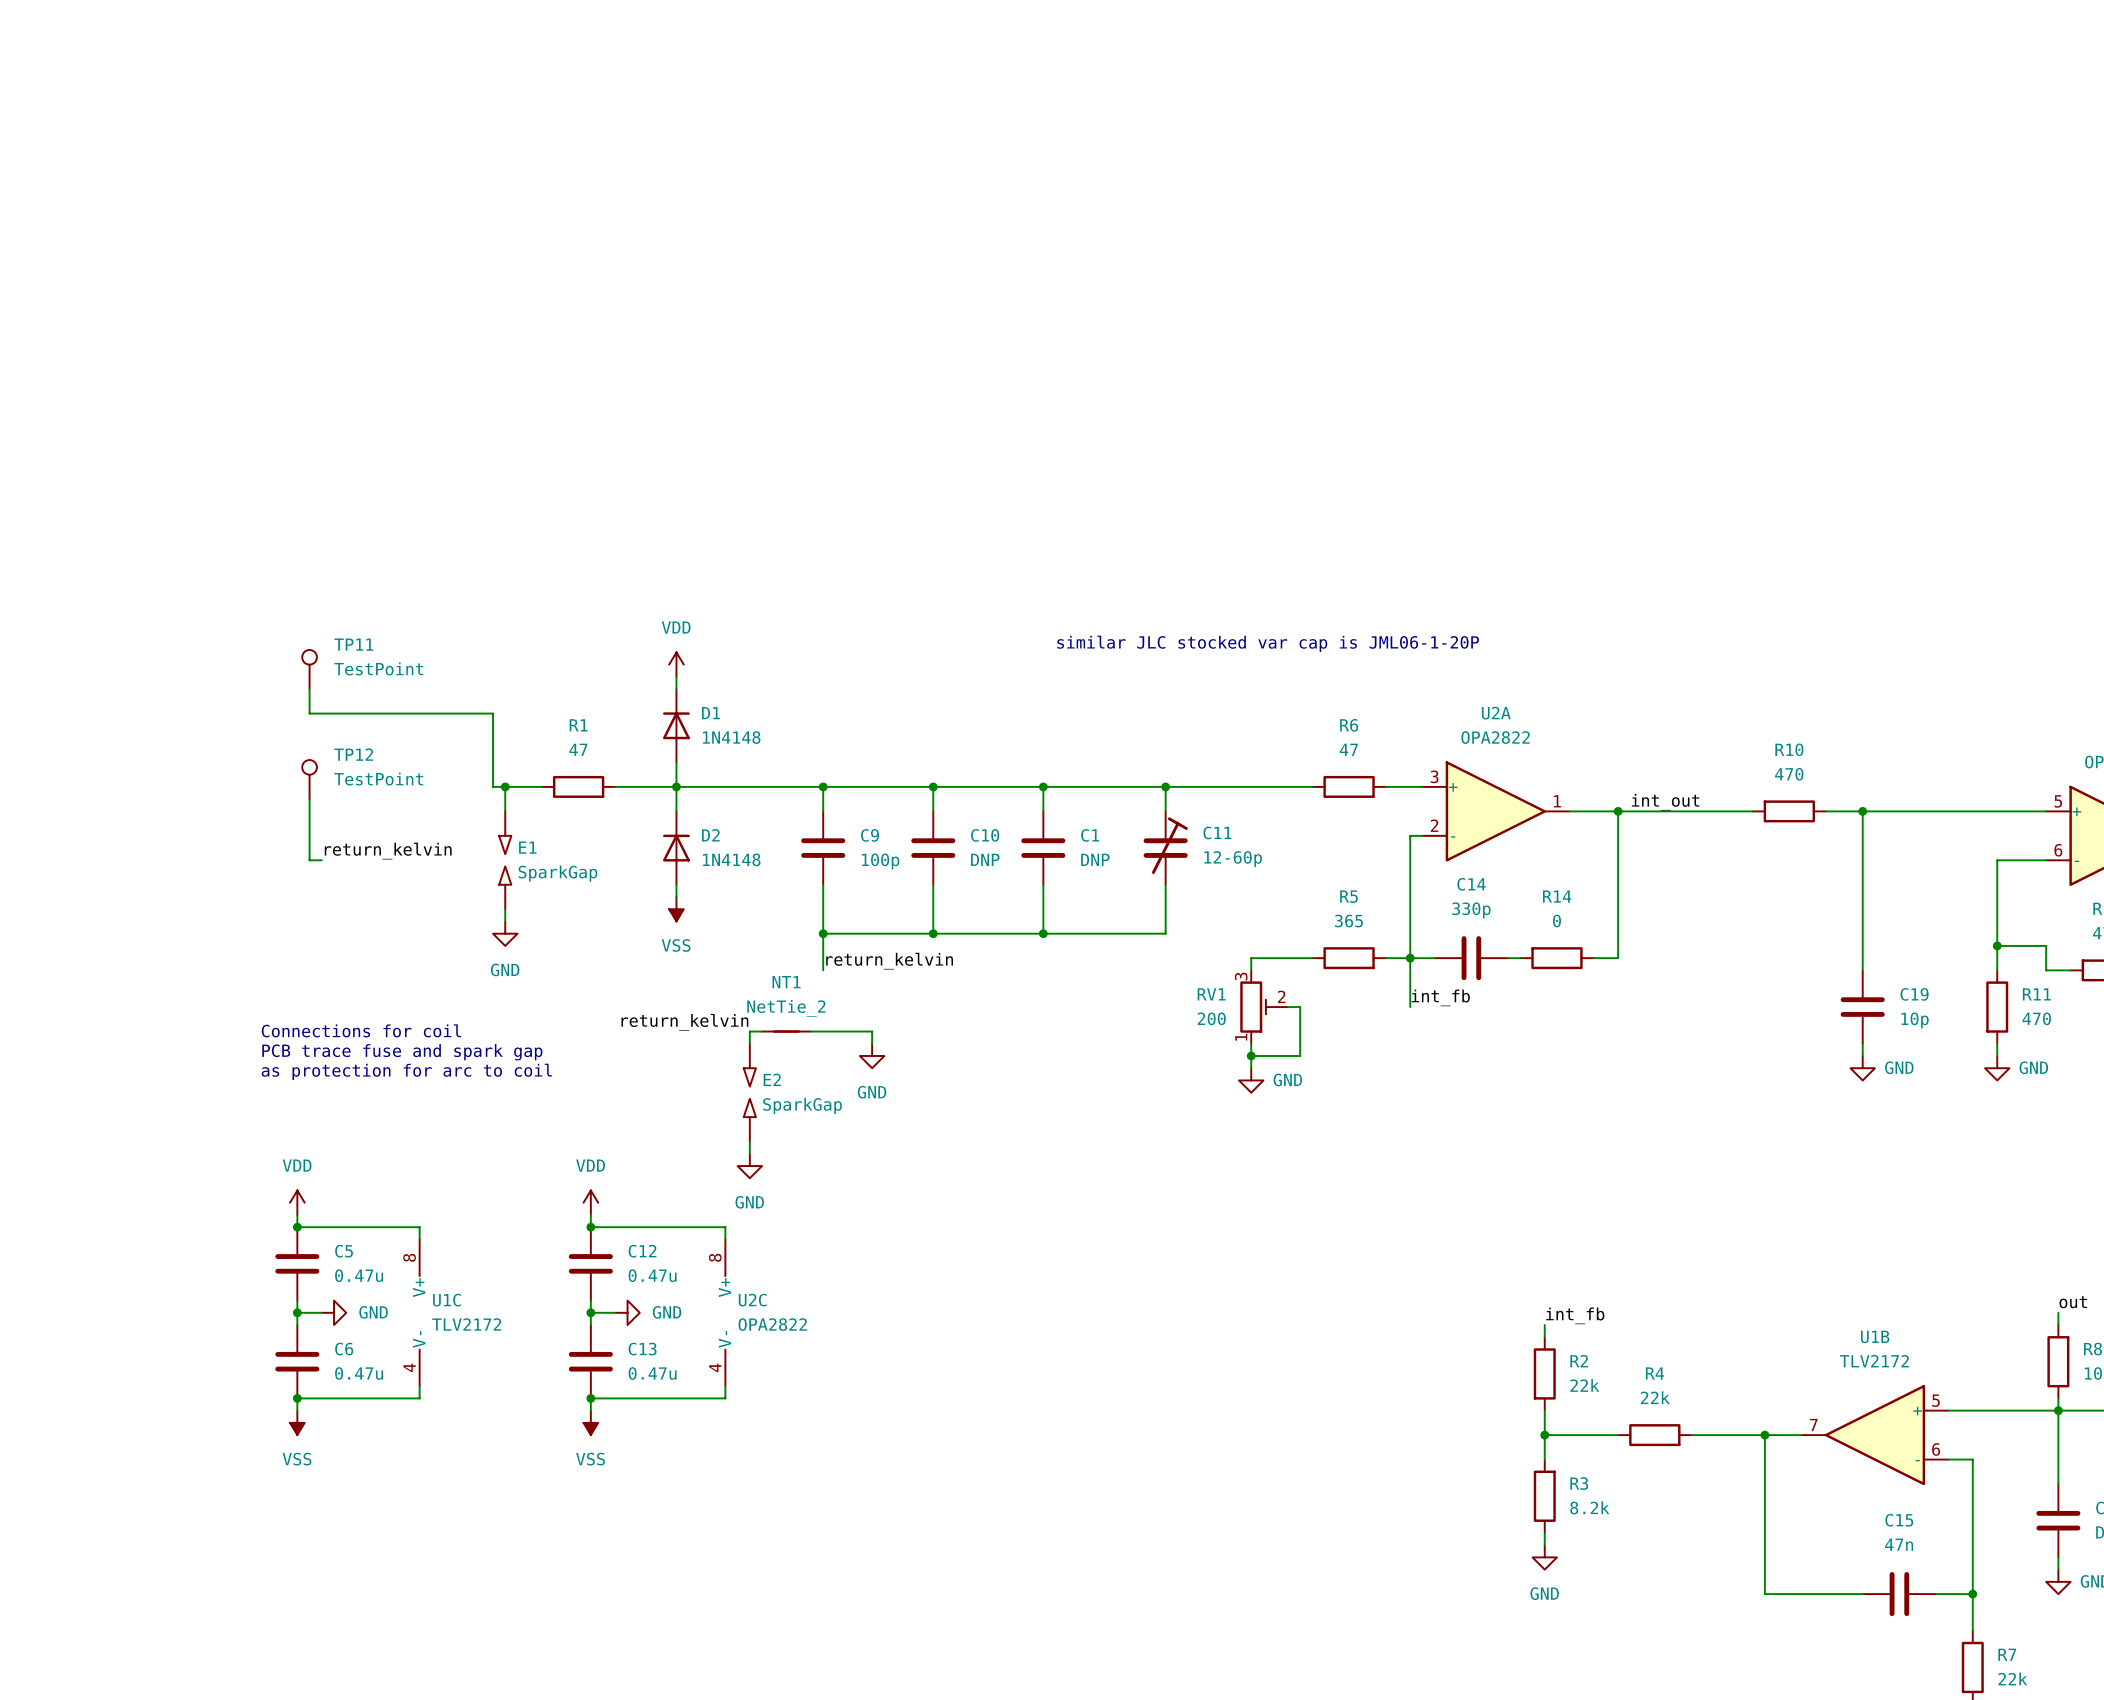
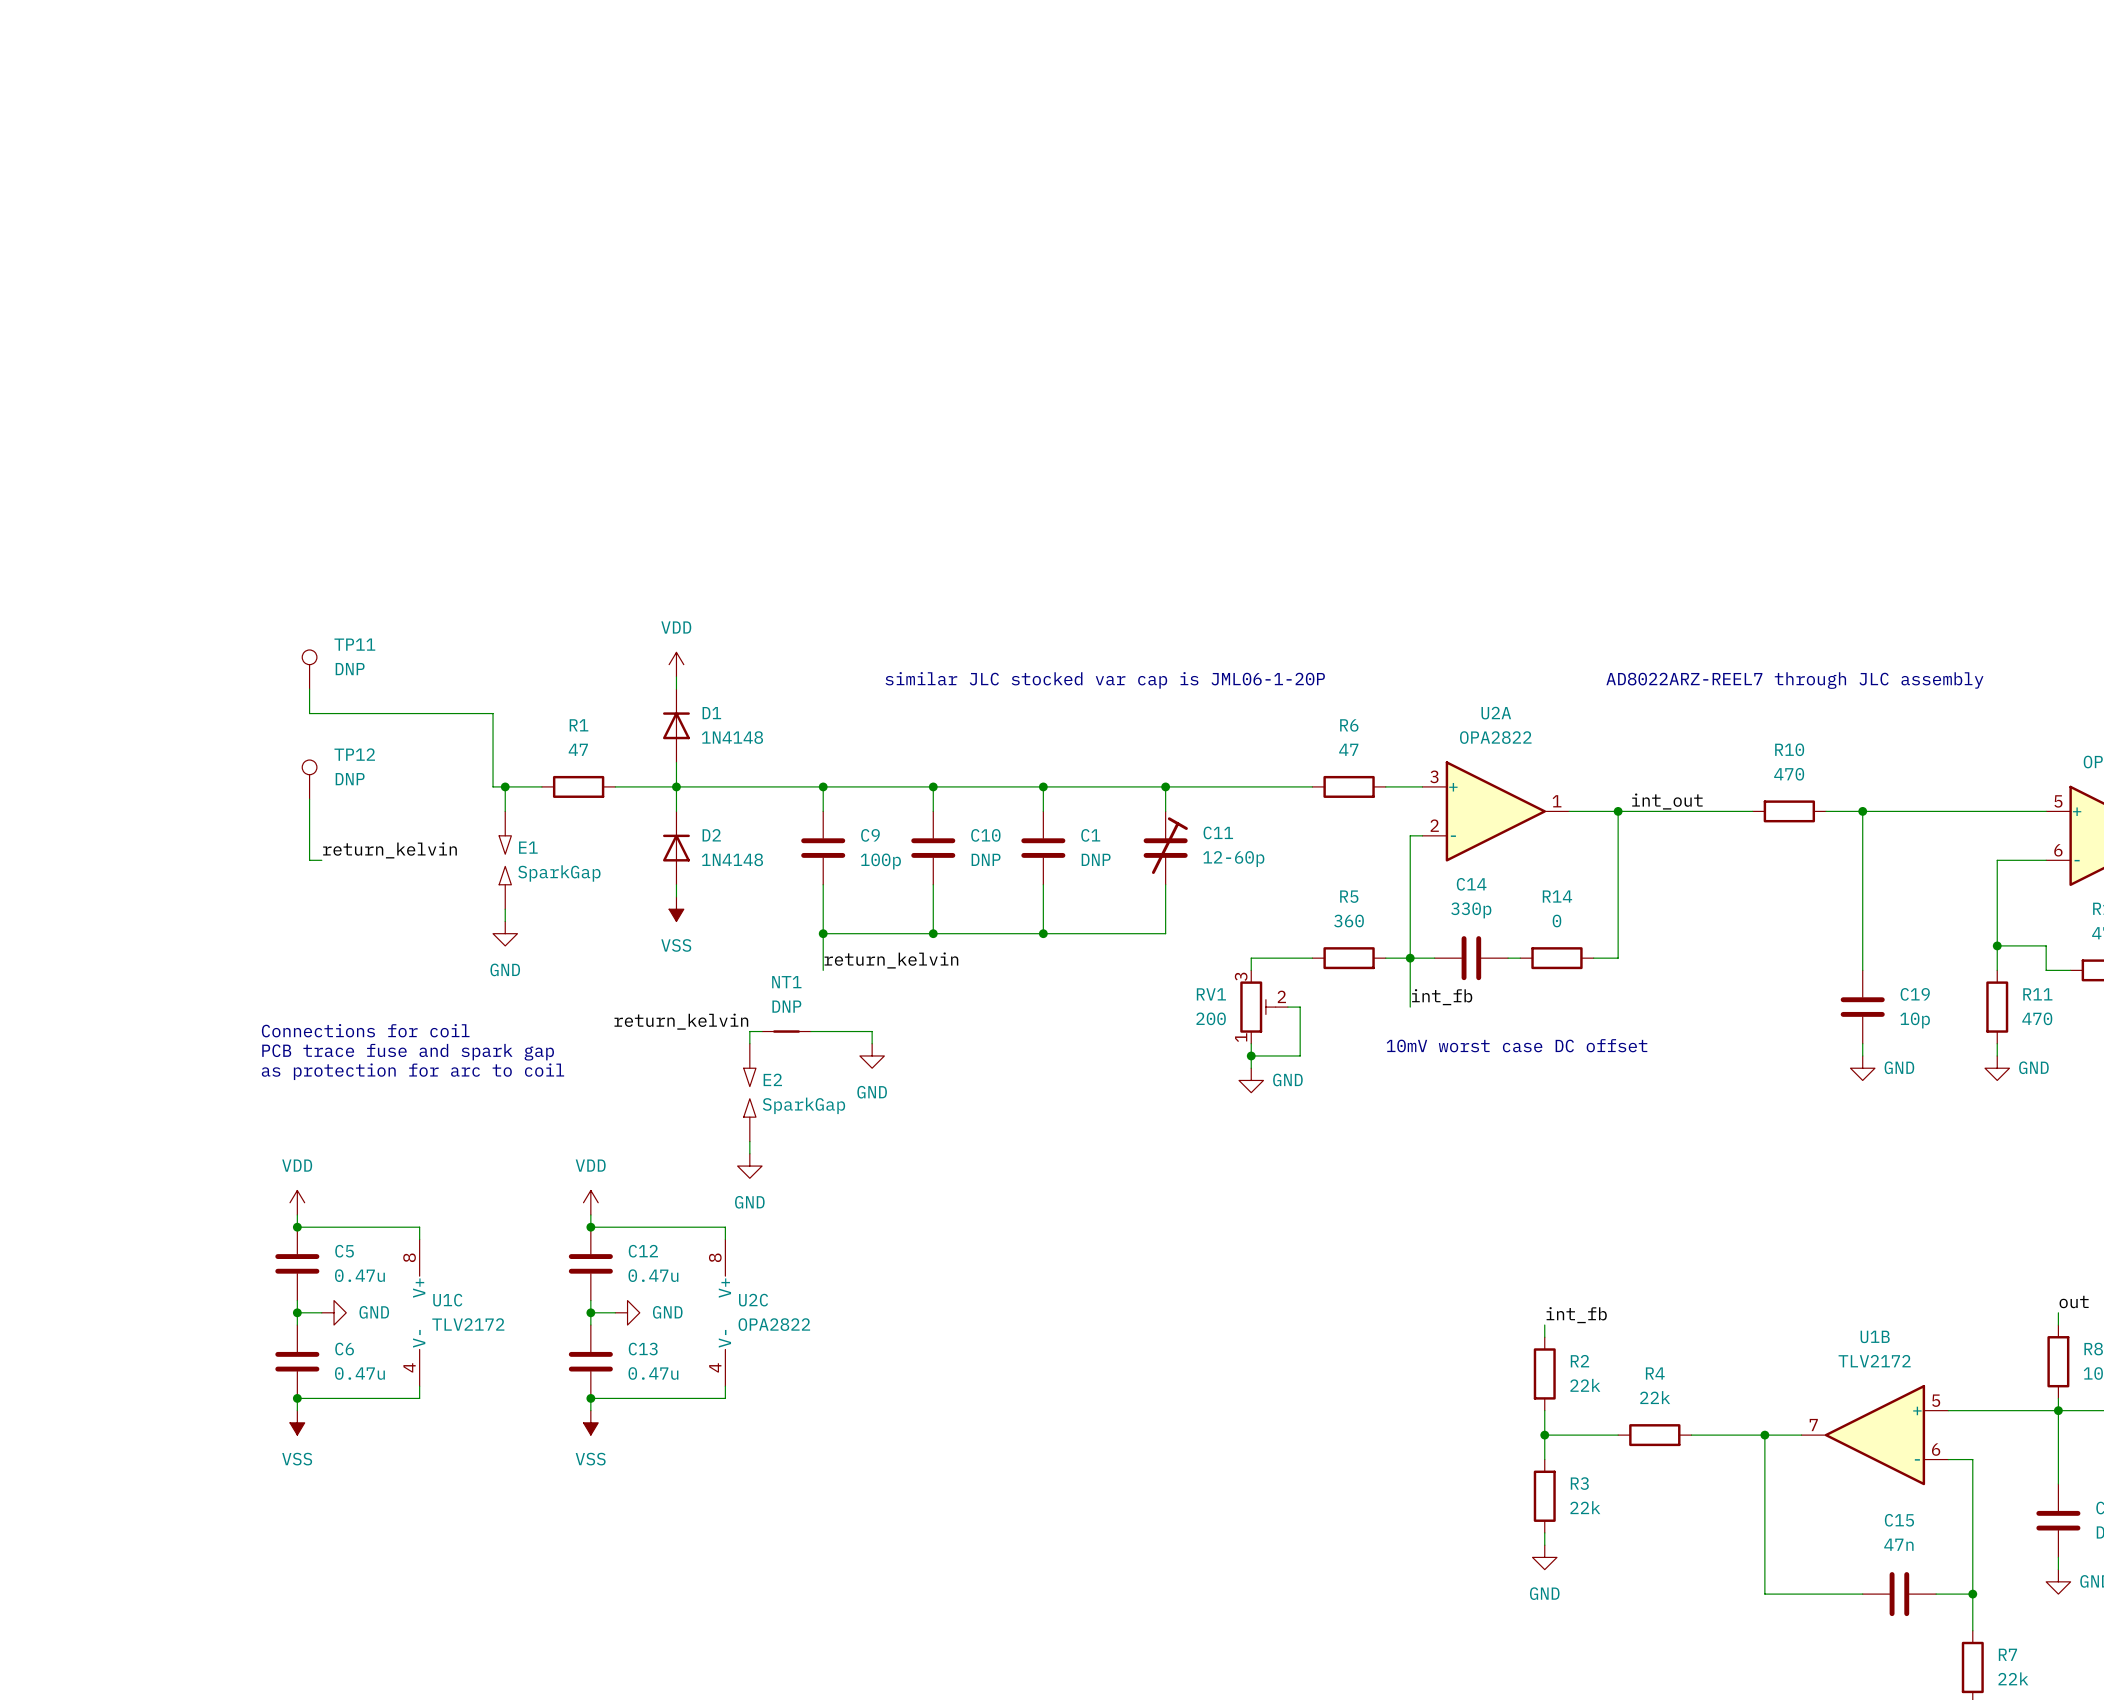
text position: similar JLC stocked var cap is JML06-1-20P (1268, 643) -> similar JLC stocked var cap is JML06-1-20P (1105, 680)
TP11 value: TestPoint (378, 668) -> DNP (350, 669)
text: none -> AD8022ARZ-REEL7 through JLC assembly (1794, 680)
TP12 value: TestPoint (378, 779) -> DNP (350, 779)
R5 value: 365 (1348, 921) -> 360 (1349, 921)
NT1 value: NetTie_2 (786, 1008) -> DNP (786, 1006)
text: none -> 10mV worst case DC offset (1517, 1045)
R3 value: 8.2k (1589, 1507) -> 22k (1585, 1507)

